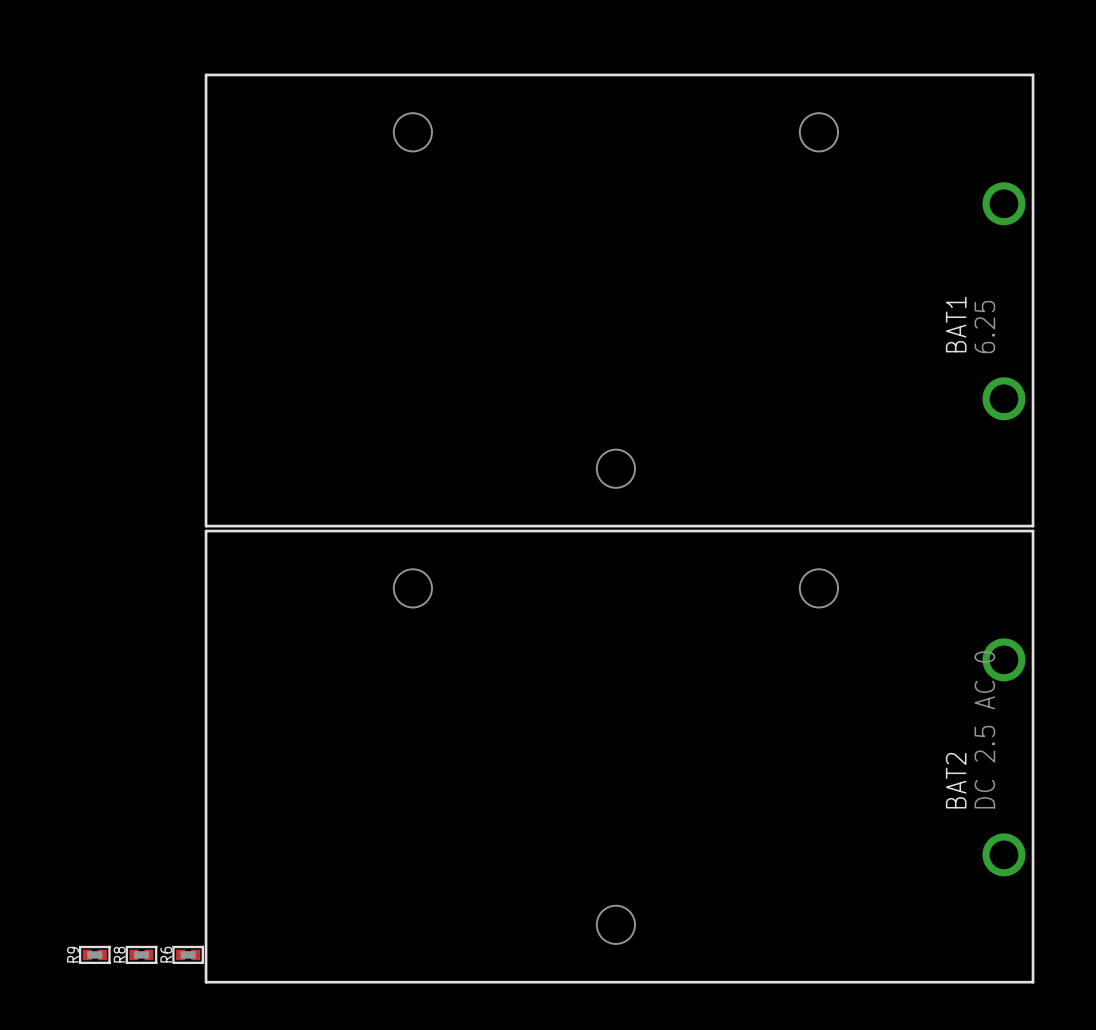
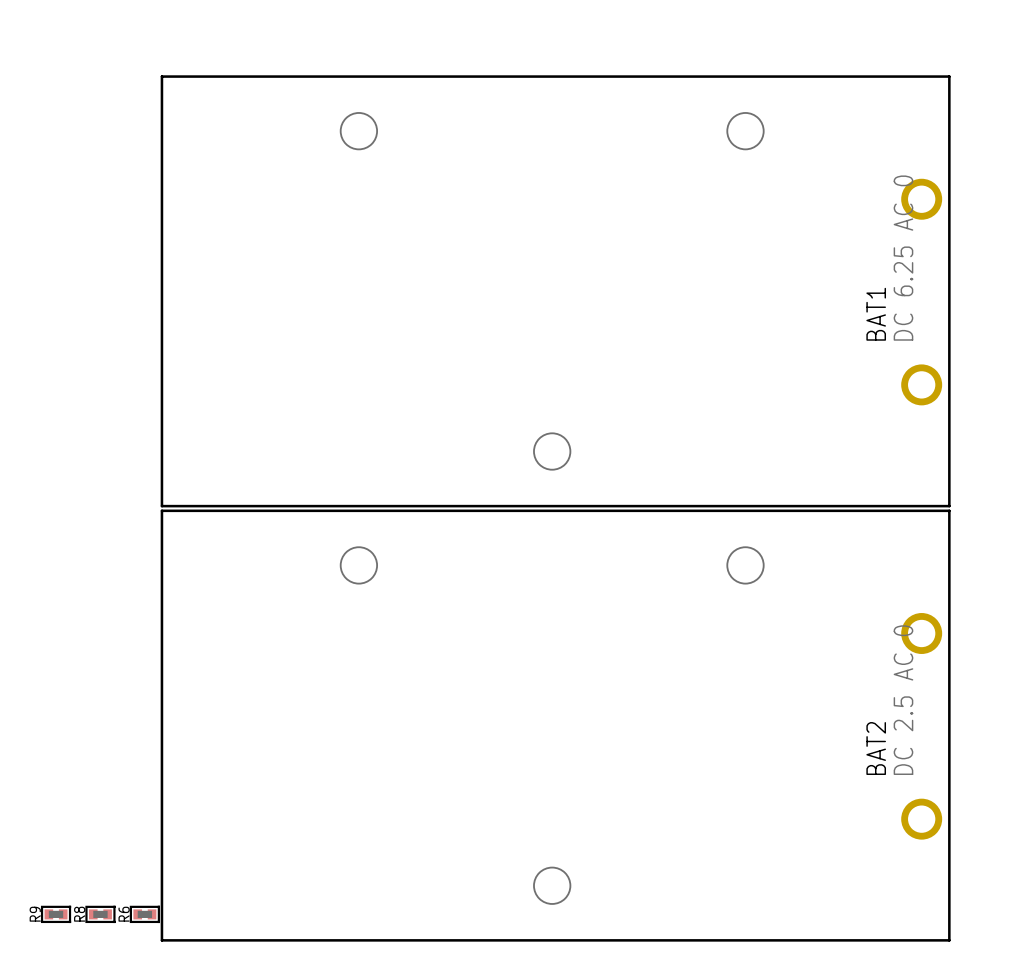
BAT1 value: 6.25 (984, 327) -> DC 6.25 AC 0 (903, 258)

